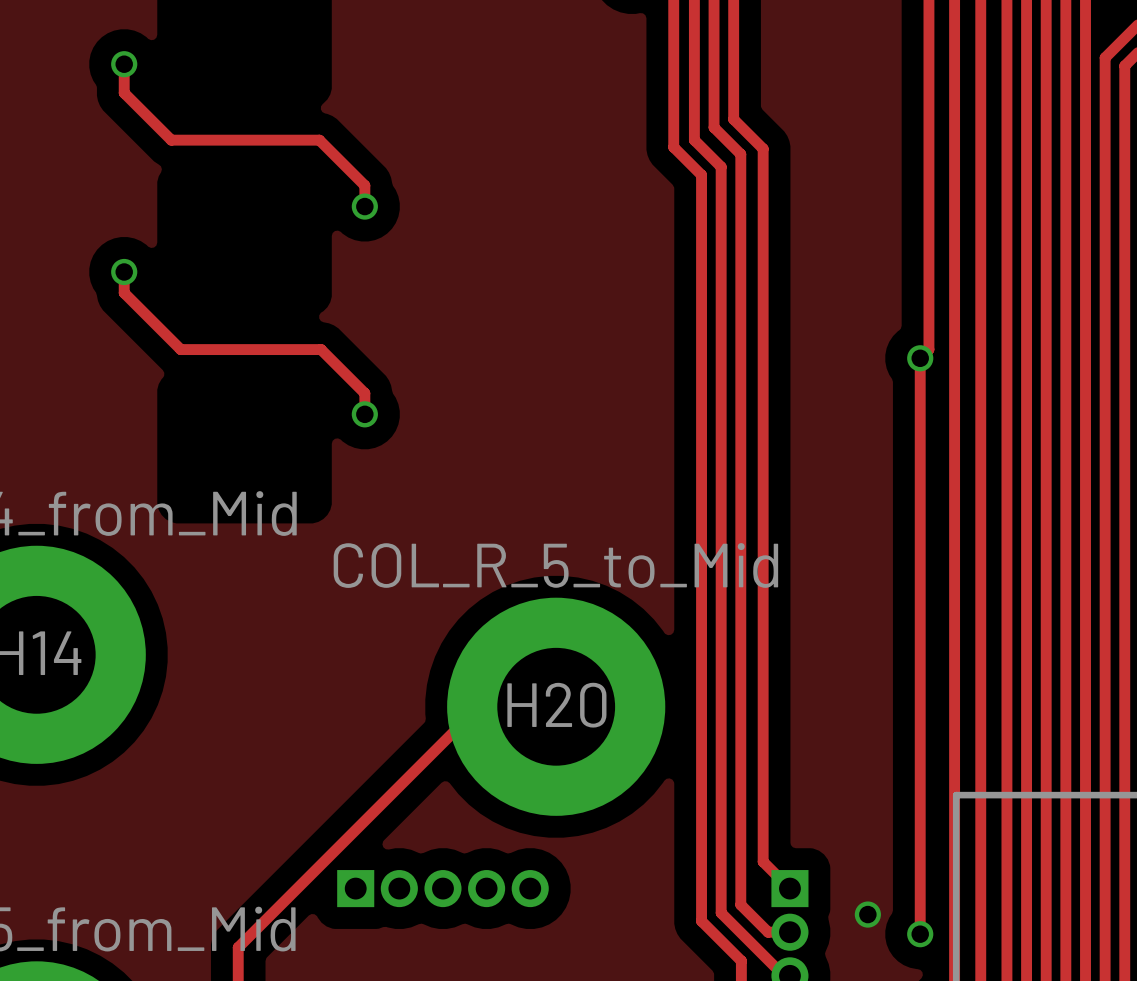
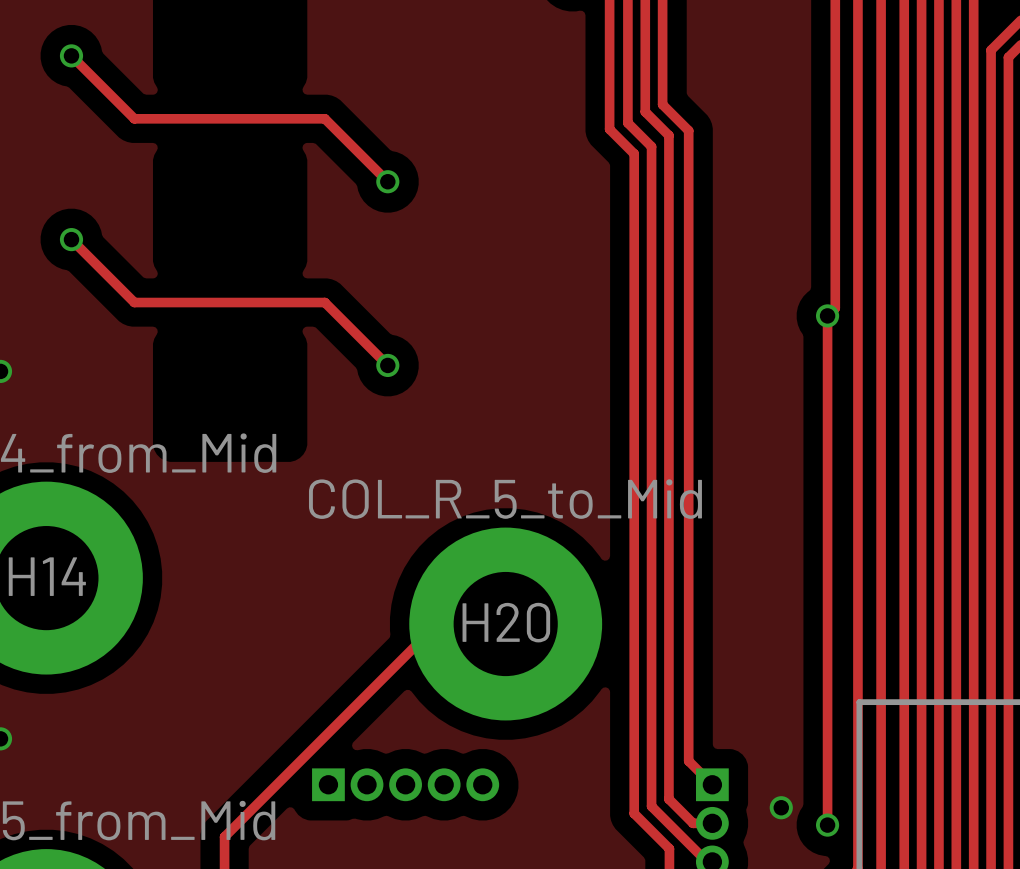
track: none -> (71, 55) (134, 118) (324, 118) (387, 181)
track: (124, 64) (124, 93) (171, 140) (319, 140) (364, 185) (364, 206) -> none
via position: (124, 64) -> (71, 55)
via position: (364, 206) -> (387, 181)
track: none -> (71, 239) (134, 302) (324, 302) (387, 365)
track: (124, 271) (124, 292) (180, 349) (321, 349) (364, 393) (364, 414) -> none
via position: (124, 271) -> (71, 239)
via position: (364, 414) -> (387, 365)

